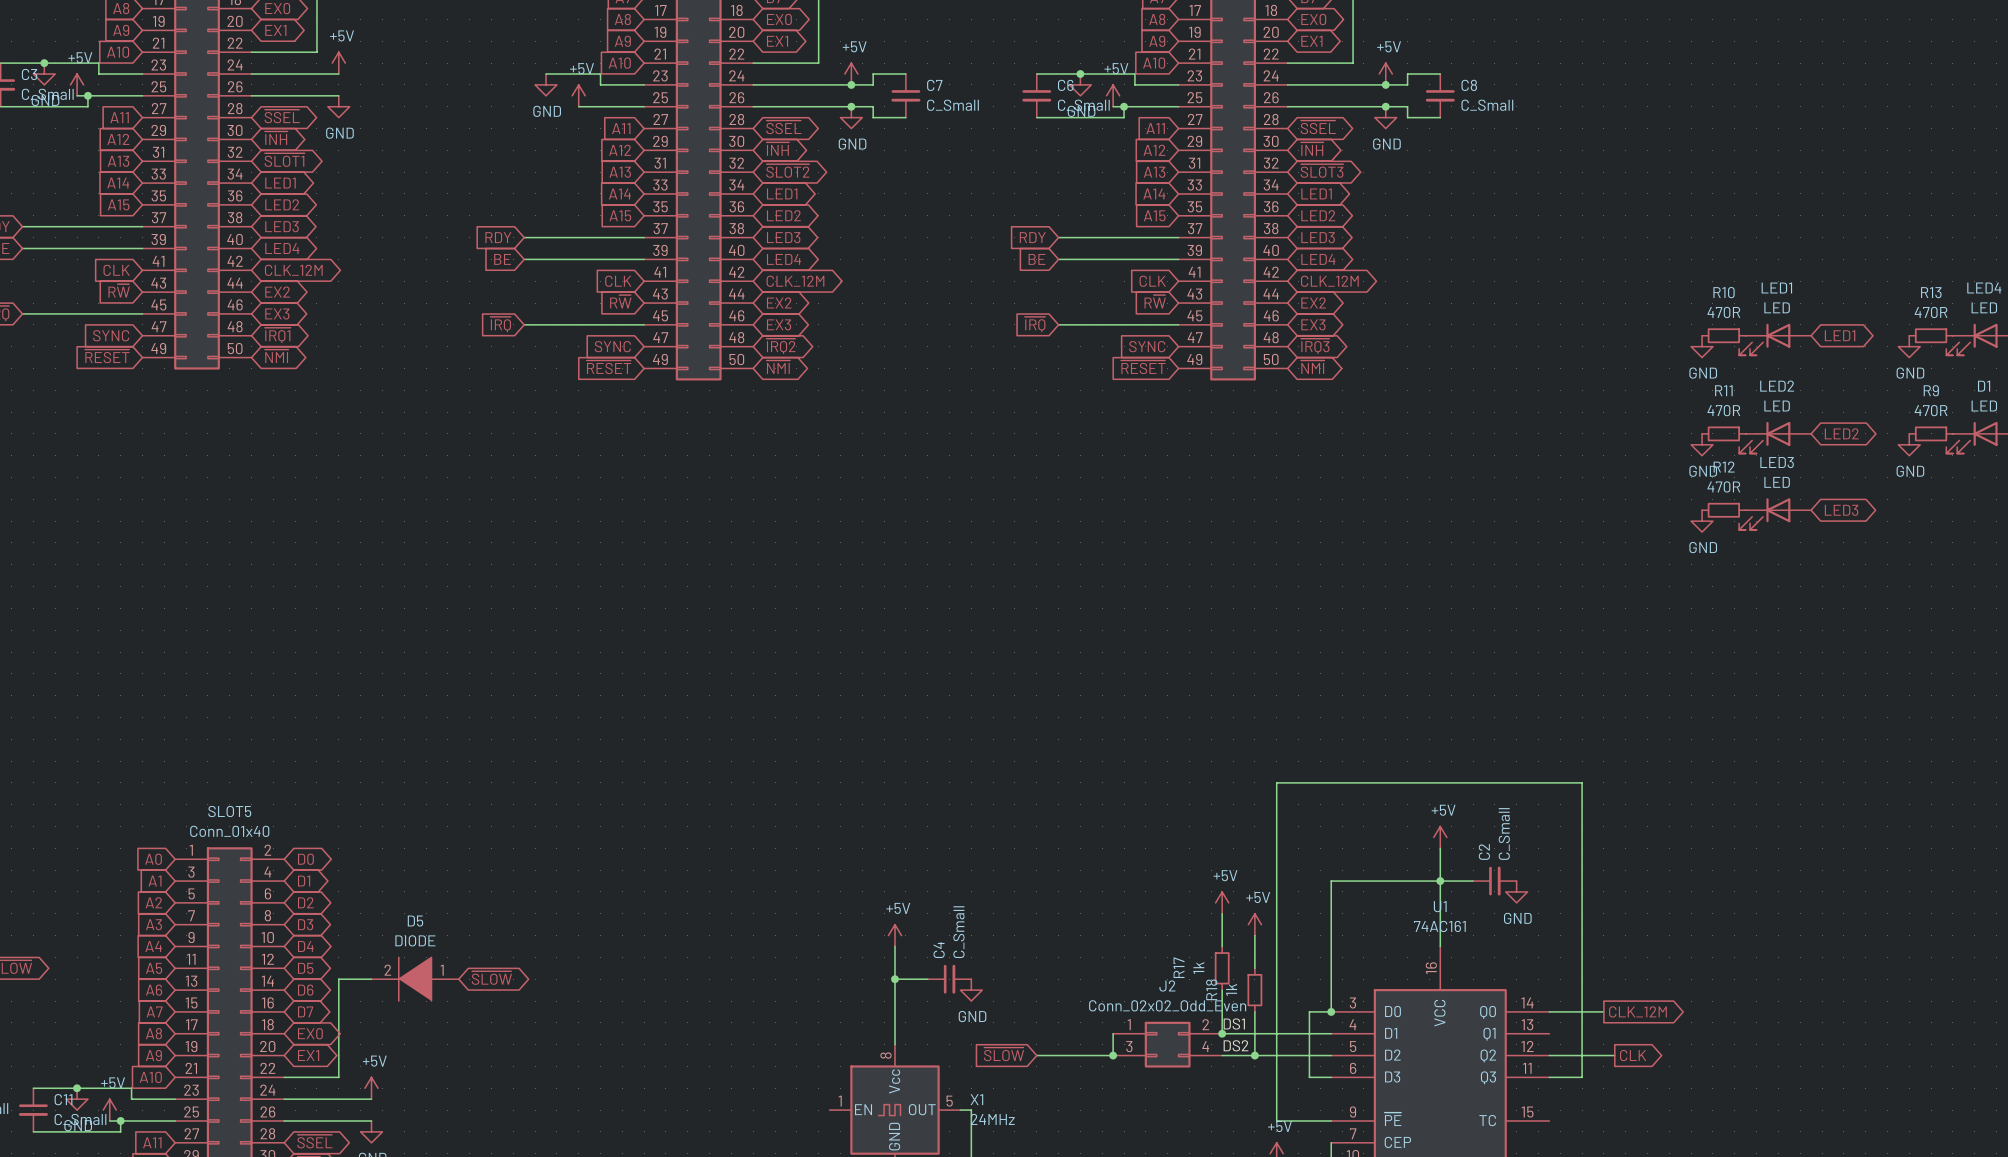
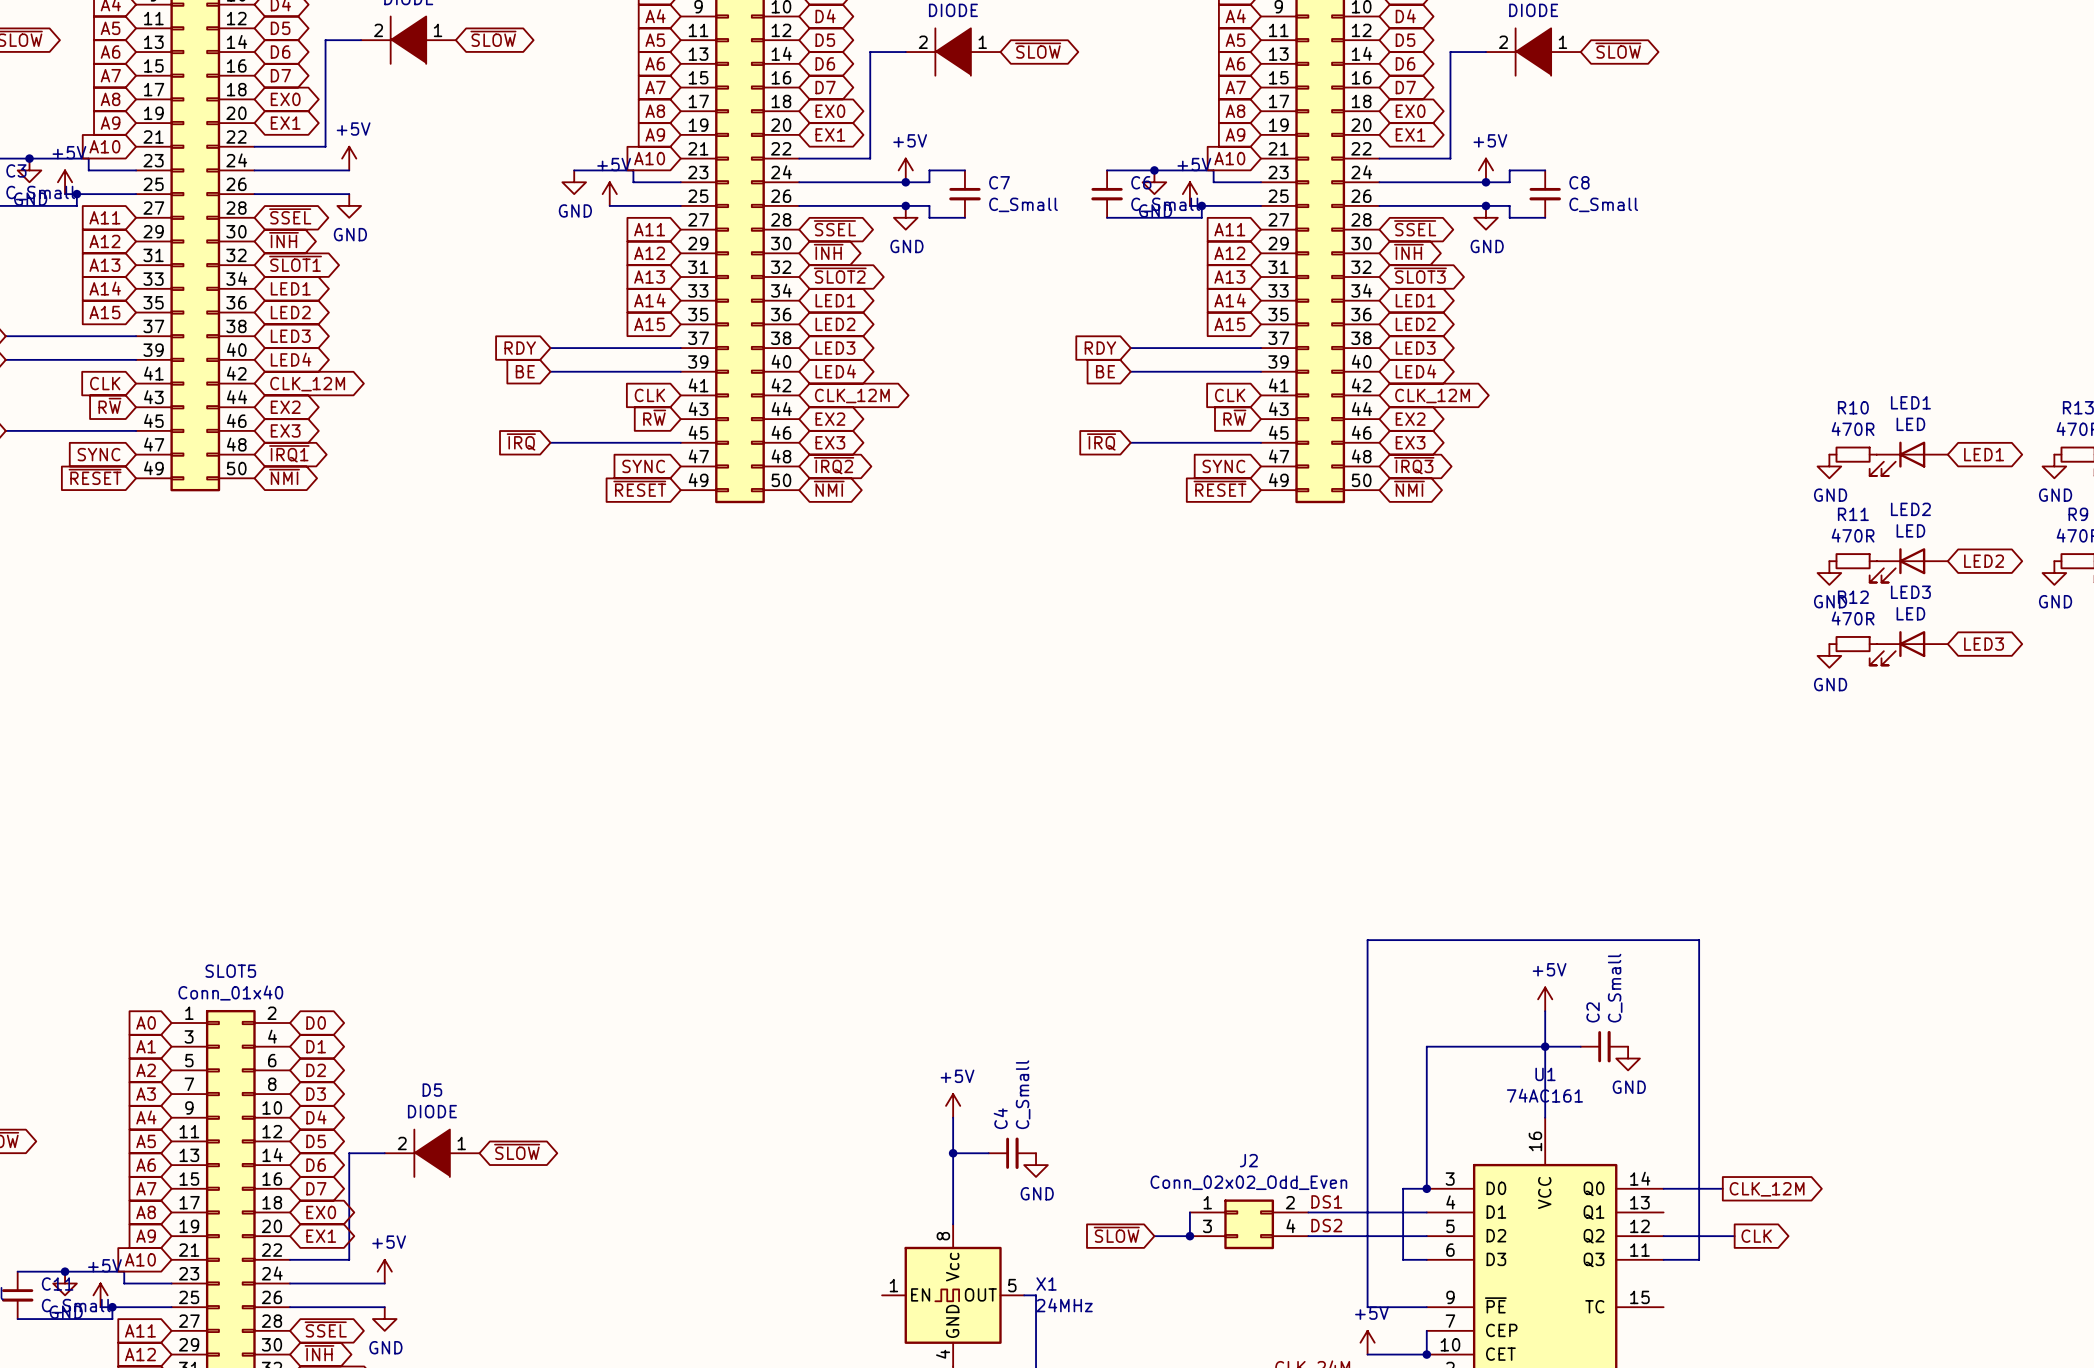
power symbol: +5V (1222, 902) -> none
wire: (1222, 913) (1222, 946) -> none
power symbol: +5V (1254, 924) -> none
wire: (1254, 935) (1254, 968) -> none
R17: 1k (1222, 968) -> none
wire: (1222, 990) (1222, 1033) -> none
R18: 1k (1254, 990) -> none
wire: (1254, 1011) (1254, 1055) -> none
junction: (1222, 1033) -> none
global label position: ~{SLOW} (1004, 1054) -> ~{SLOW} (1116, 1234)
wire: (1036, 1055) (1080, 1055) -> none
junction: (1254, 1055) -> none

